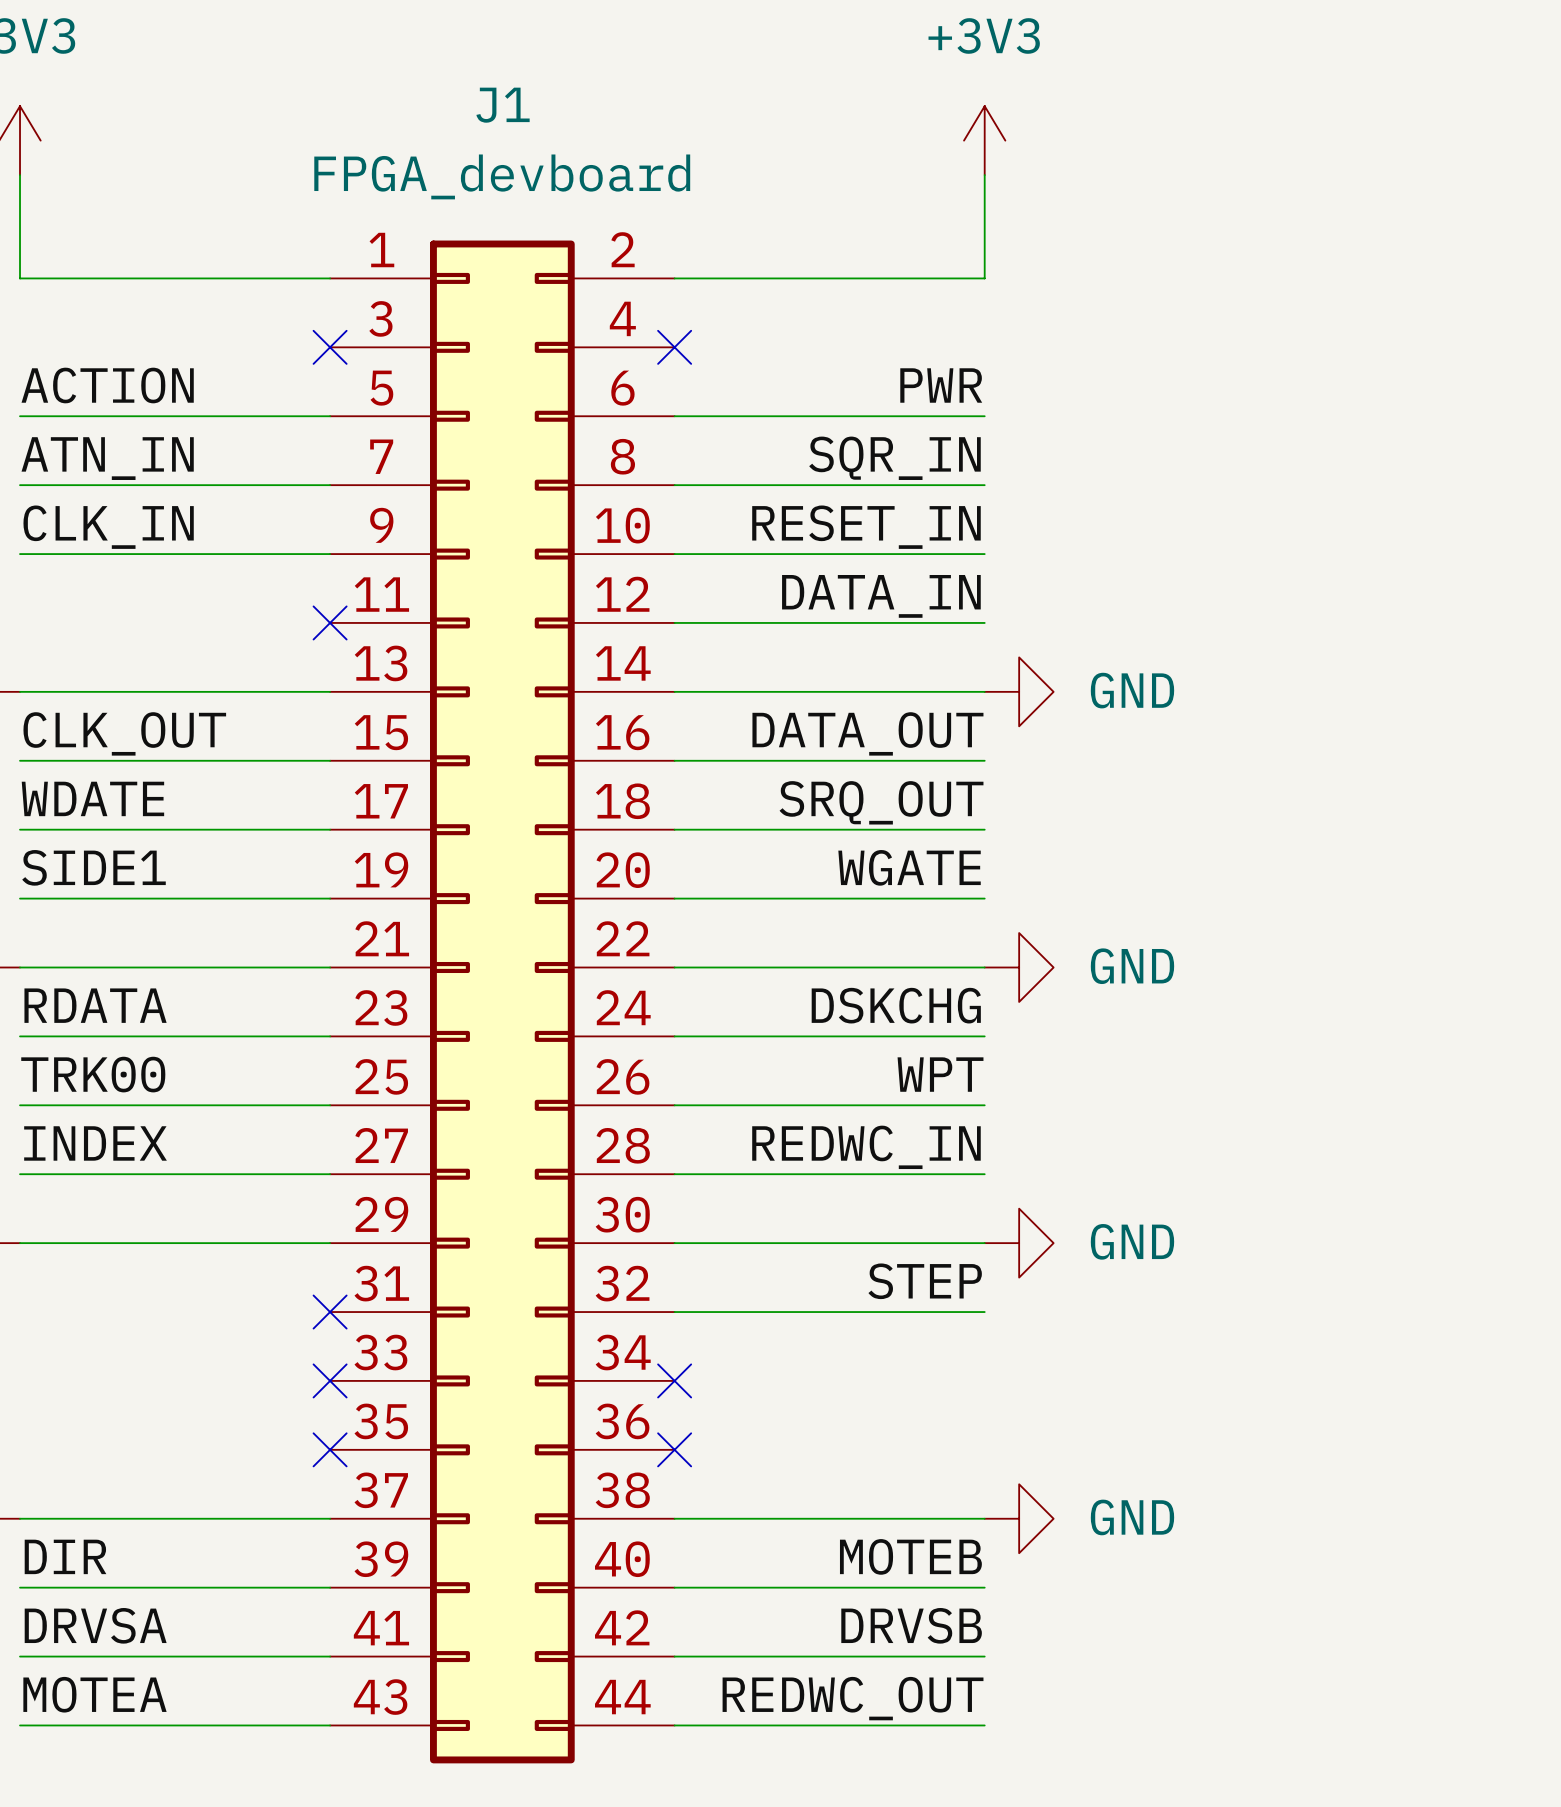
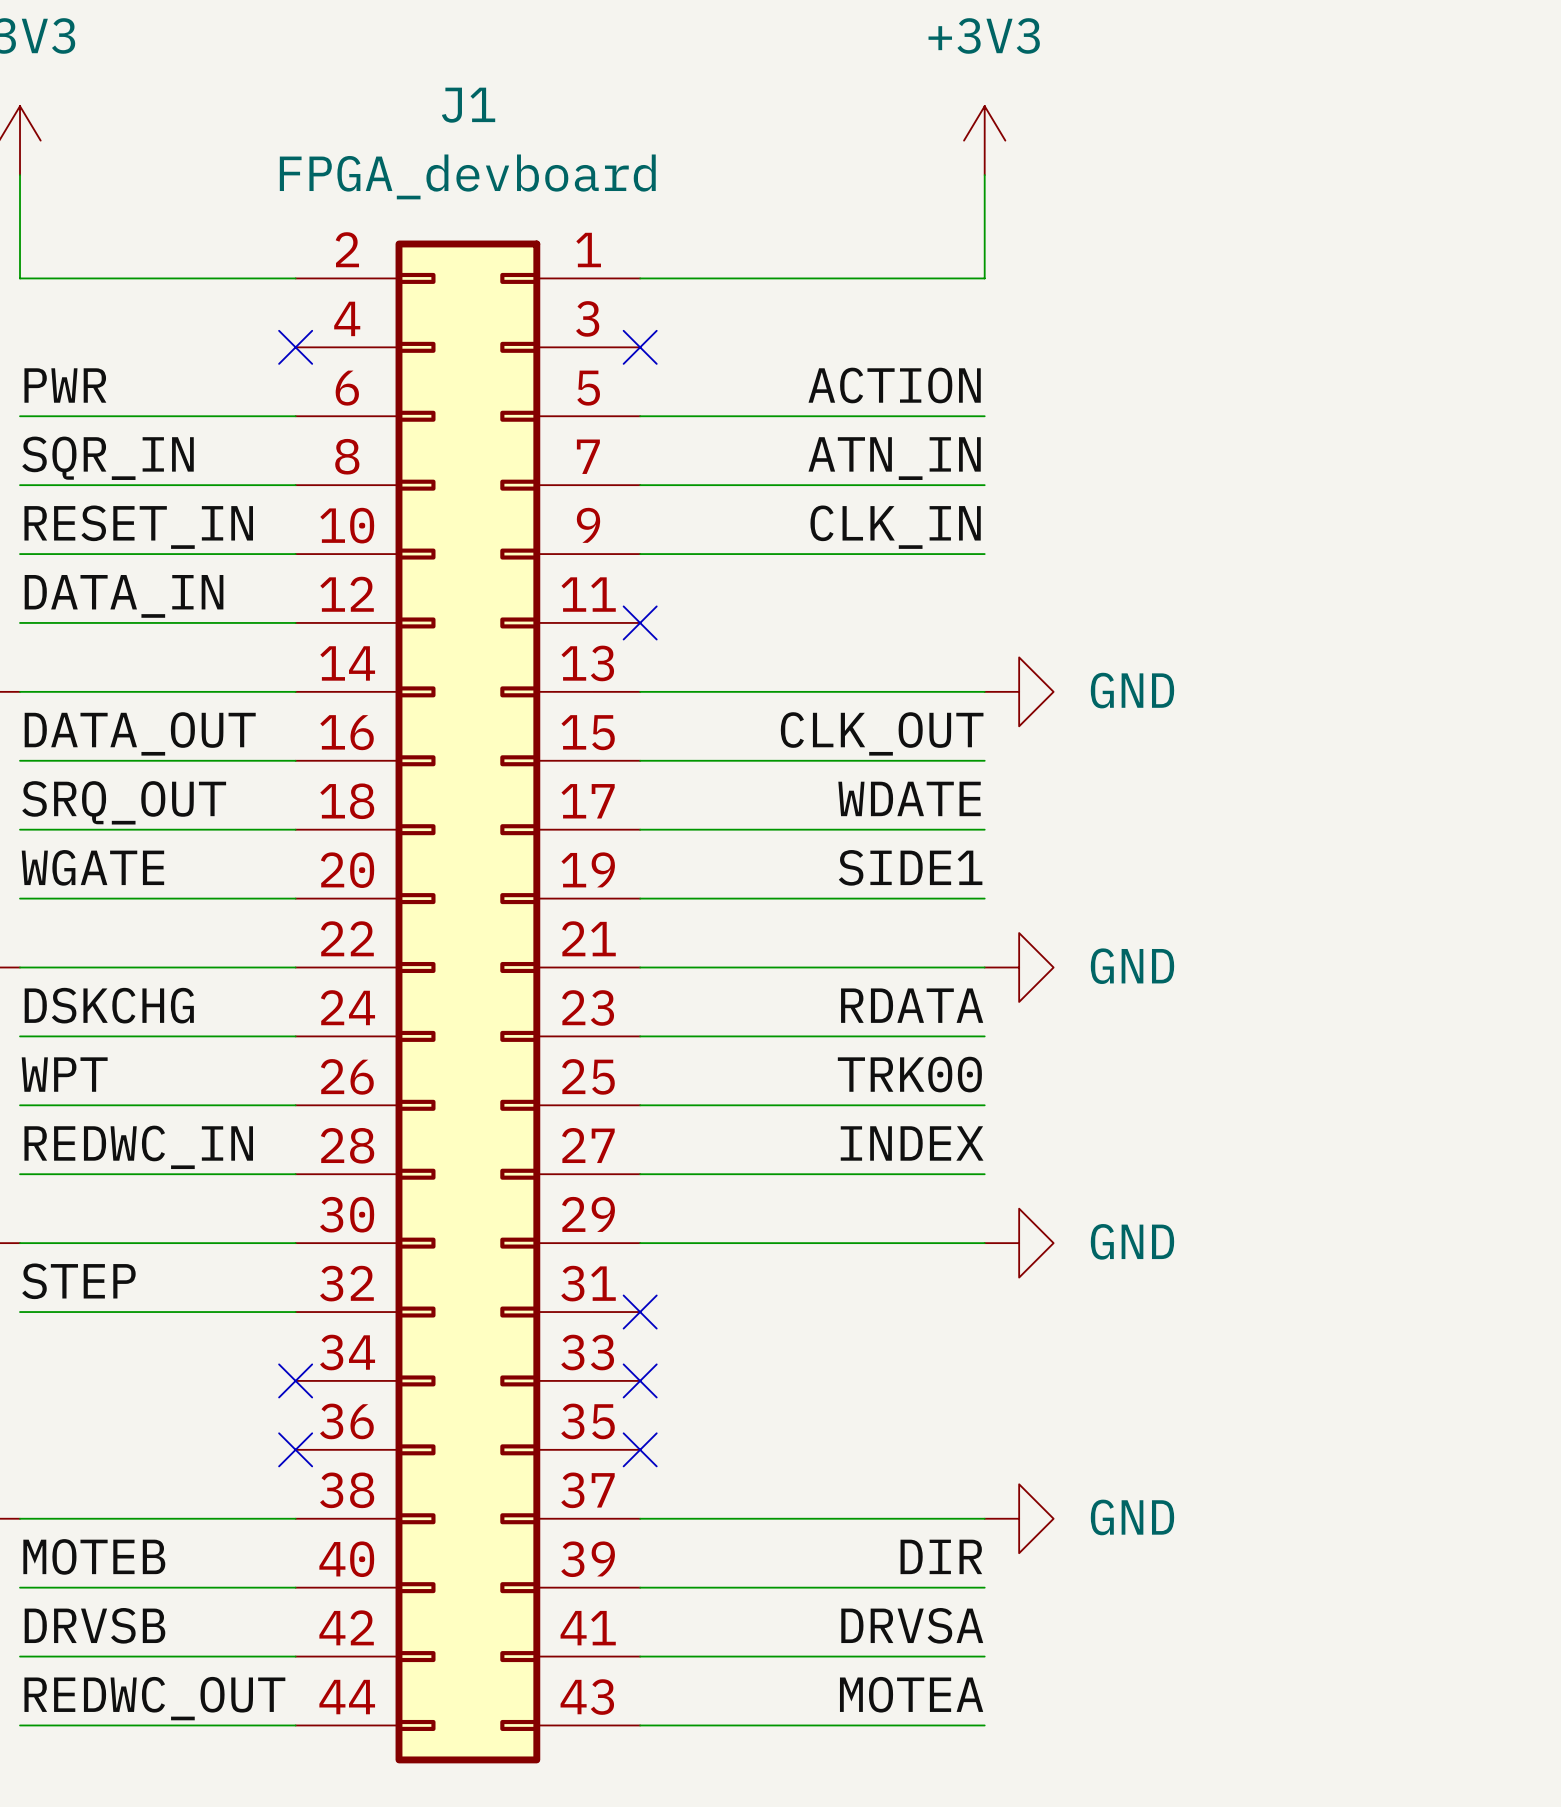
no-connect mark position: (330, 347) -> (295, 347)
no-connect mark position: (674, 347) -> (640, 347)
label: ACTION (107, 385) -> PWR (65, 385)
label: PWR (941, 385) -> ACTION (894, 385)
label: ATN_IN (107, 458) -> SQR_IN (108, 458)
label: SQR_IN (894, 458) -> ATN_IN (894, 458)
label: CLK_IN (108, 527) -> RESET_IN (138, 527)
label: RESET_IN (866, 527) -> CLK_IN (895, 527)
label: none -> DATA_IN (124, 596)
label: DATA_IN (881, 596) -> none
wire: none -> (20, 622) (295, 622)
no-connect mark: (330, 622) -> none
no-connect mark: none -> (640, 622)
wire: (674, 622) (984, 622) -> none
label: CLK_OUT (124, 733) -> DATA_OUT (140, 733)
label: DATA_OUT (867, 733) -> CLK_OUT (882, 733)
label: WDATE (92, 798) -> SRQ_OUT (124, 802)
label: SRQ_OUT (881, 802) -> WDATE (909, 798)
label: SIDE1 (94, 867) -> WGATE (92, 867)
label: WGATE (909, 867) -> SIDE1 (910, 867)
J1 flip: as is (502, 1001) -> left-right (467, 1001)
label: RDATA (95, 1005) -> DSKCHG (109, 1005)
label: DSKCHG (896, 1005) -> RDATA (912, 1005)
label: TRK00 (93, 1074) -> WPT (64, 1074)
label: WPT (940, 1074) -> TRK00 (909, 1074)
label: INDEX (95, 1143) -> REDWC_IN (138, 1147)
label: REDWC_IN (866, 1147) -> INDEX (912, 1143)
label: none -> STEP (78, 1281)
label: STEP (925, 1281) -> none
wire: none -> (20, 1312) (295, 1312)
no-connect mark: (330, 1312) -> none
no-connect mark: none -> (640, 1312)
wire: (674, 1312) (984, 1312) -> none
no-connect mark position: (330, 1380) -> (295, 1380)
no-connect mark position: (674, 1380) -> (640, 1380)
no-connect mark position: (330, 1449) -> (295, 1449)
no-connect mark position: (674, 1449) -> (640, 1449)
label: DIR (65, 1556) -> MOTEB (94, 1556)
label: MOTEB (910, 1556) -> DIR (941, 1556)
label: DRVSA (95, 1625) -> DRVSB (94, 1625)
label: DRVSB (911, 1625) -> DRVSA (912, 1625)
label: MOTEA (94, 1694) -> REDWC_OUT (154, 1698)
label: REDWC_OUT (853, 1698) -> MOTEA (911, 1694)

